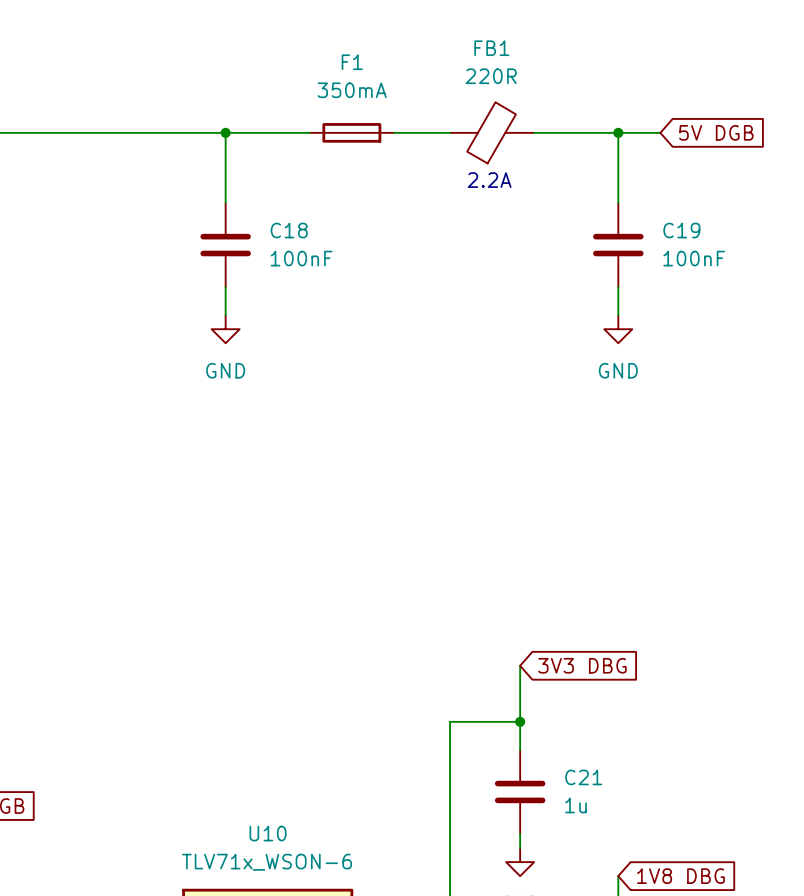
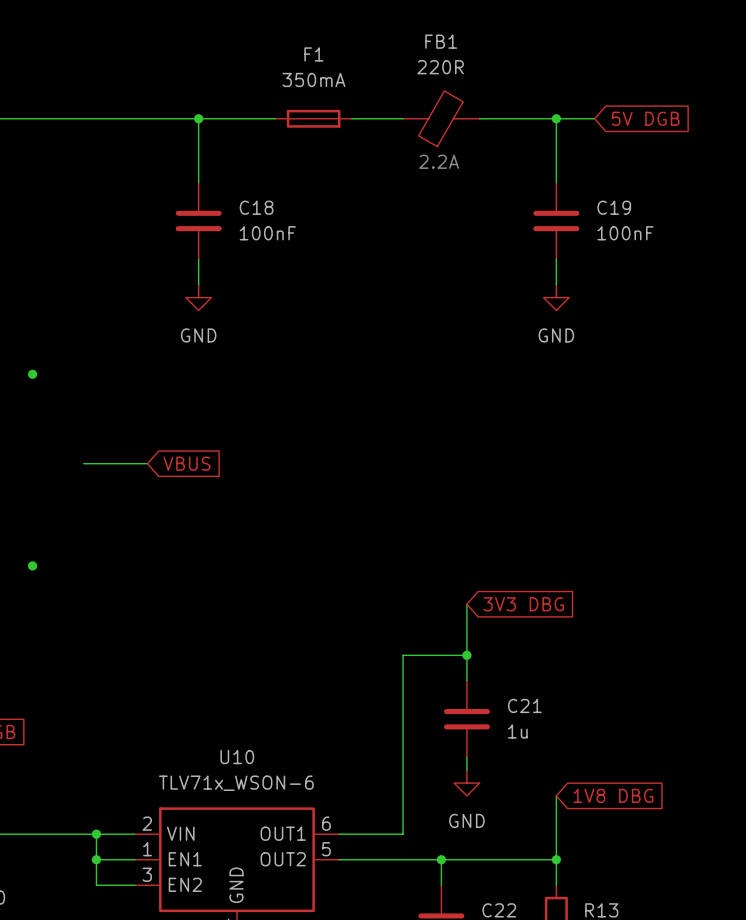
junction: none -> (32, 374)
wire: none -> (83, 463) (147, 463)
global label: none -> VBUS (186, 463)
junction: none -> (32, 565)

